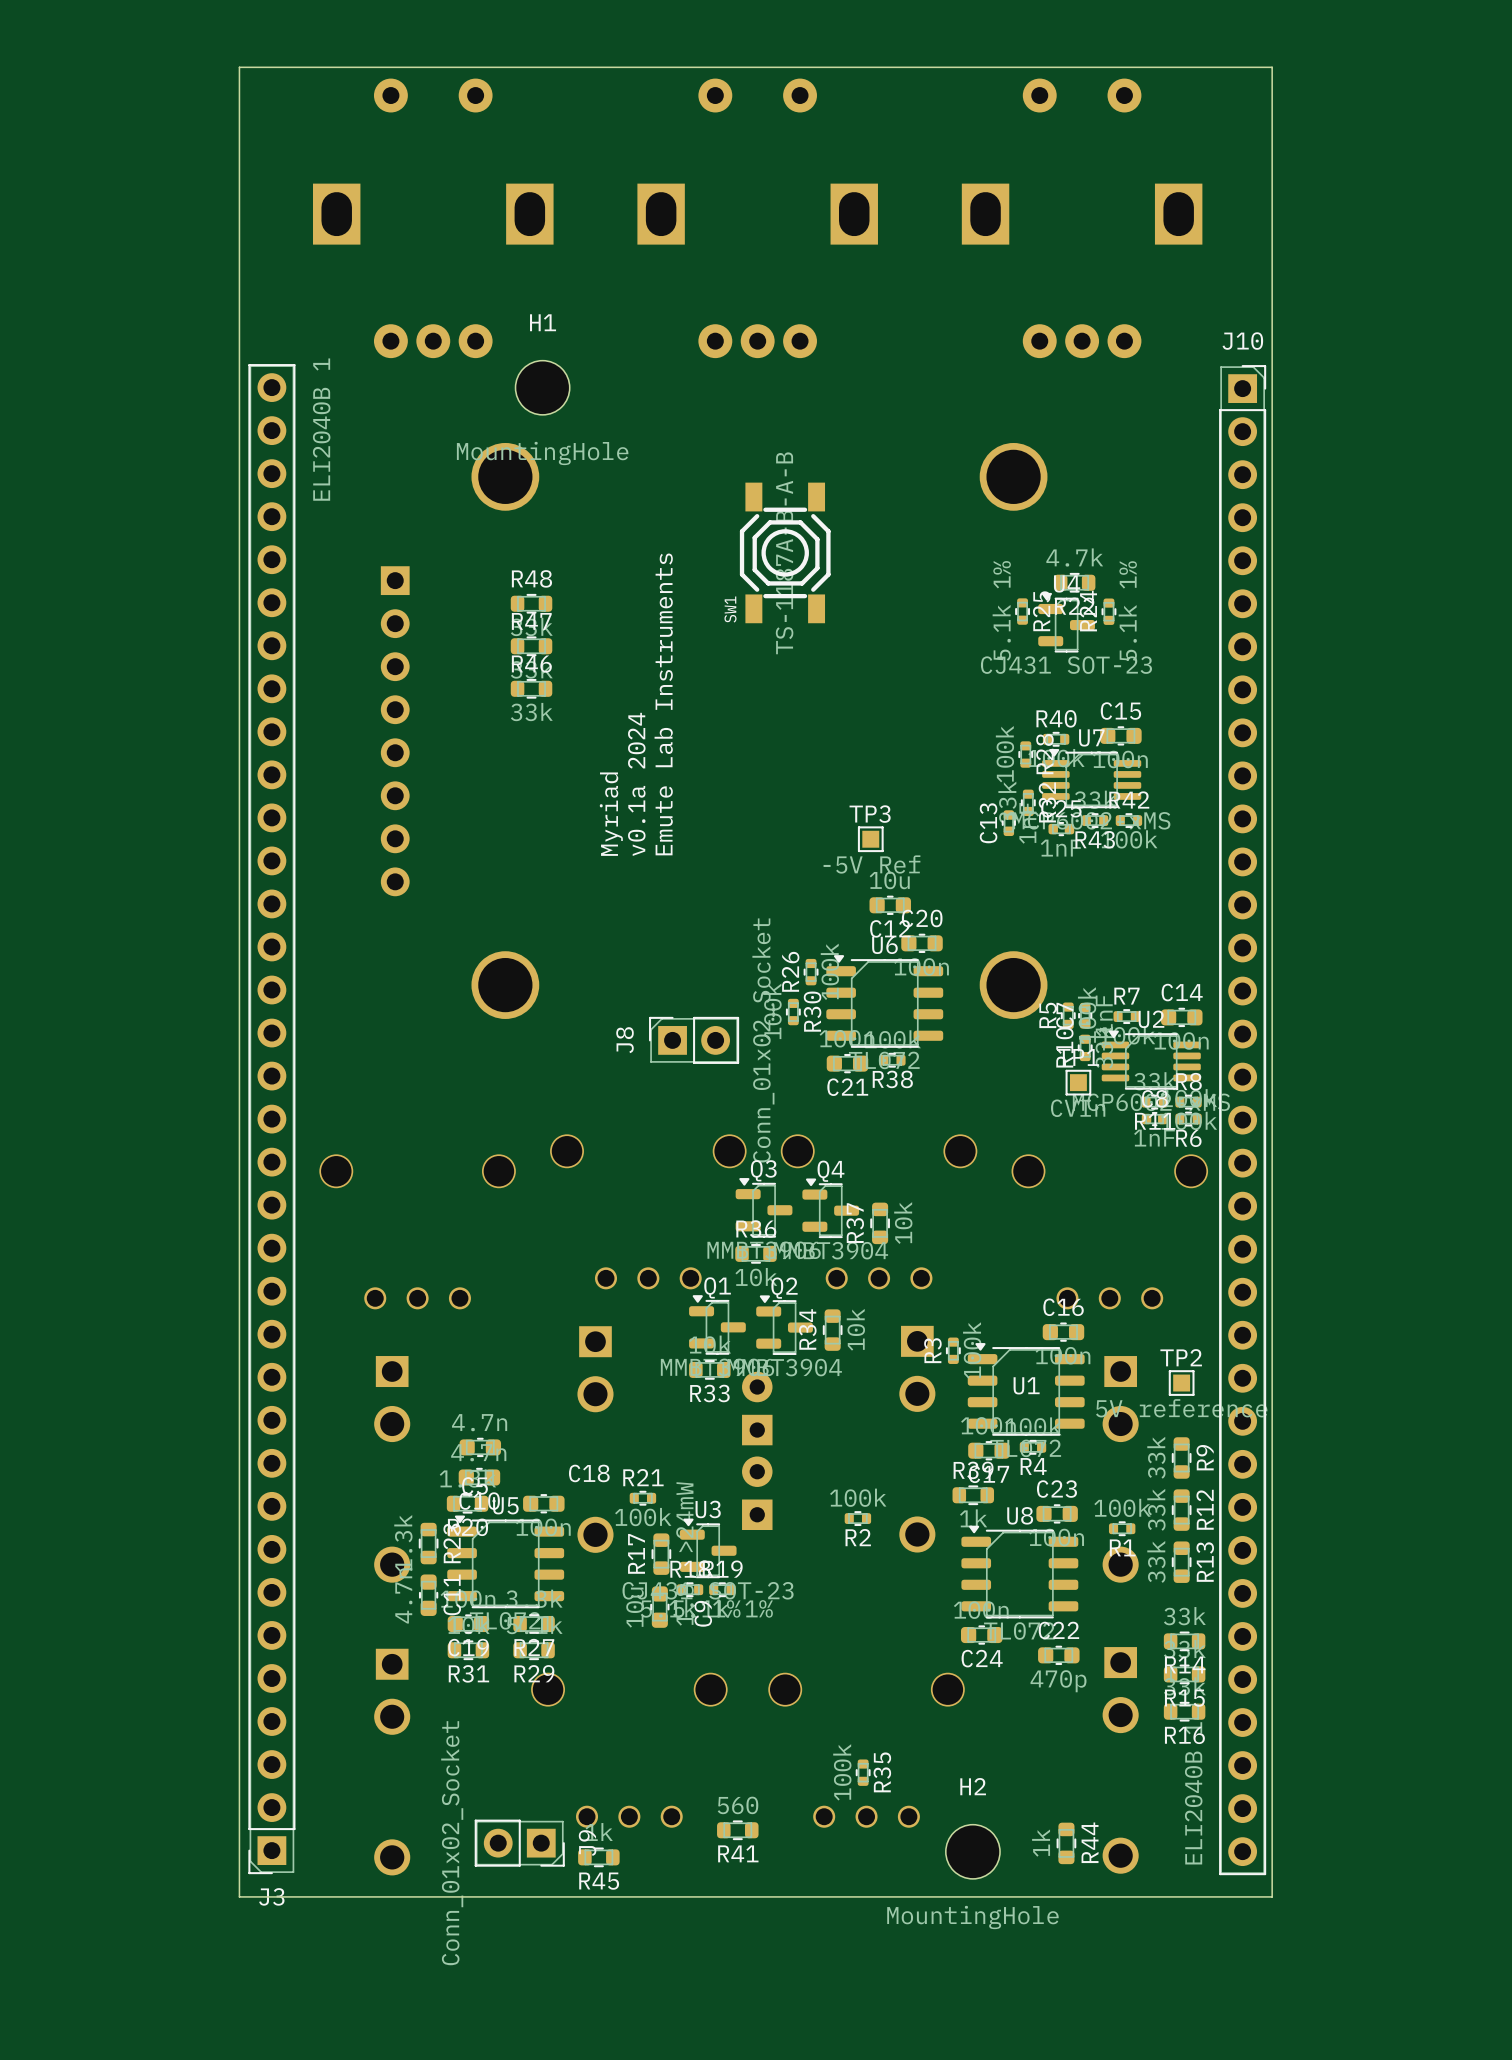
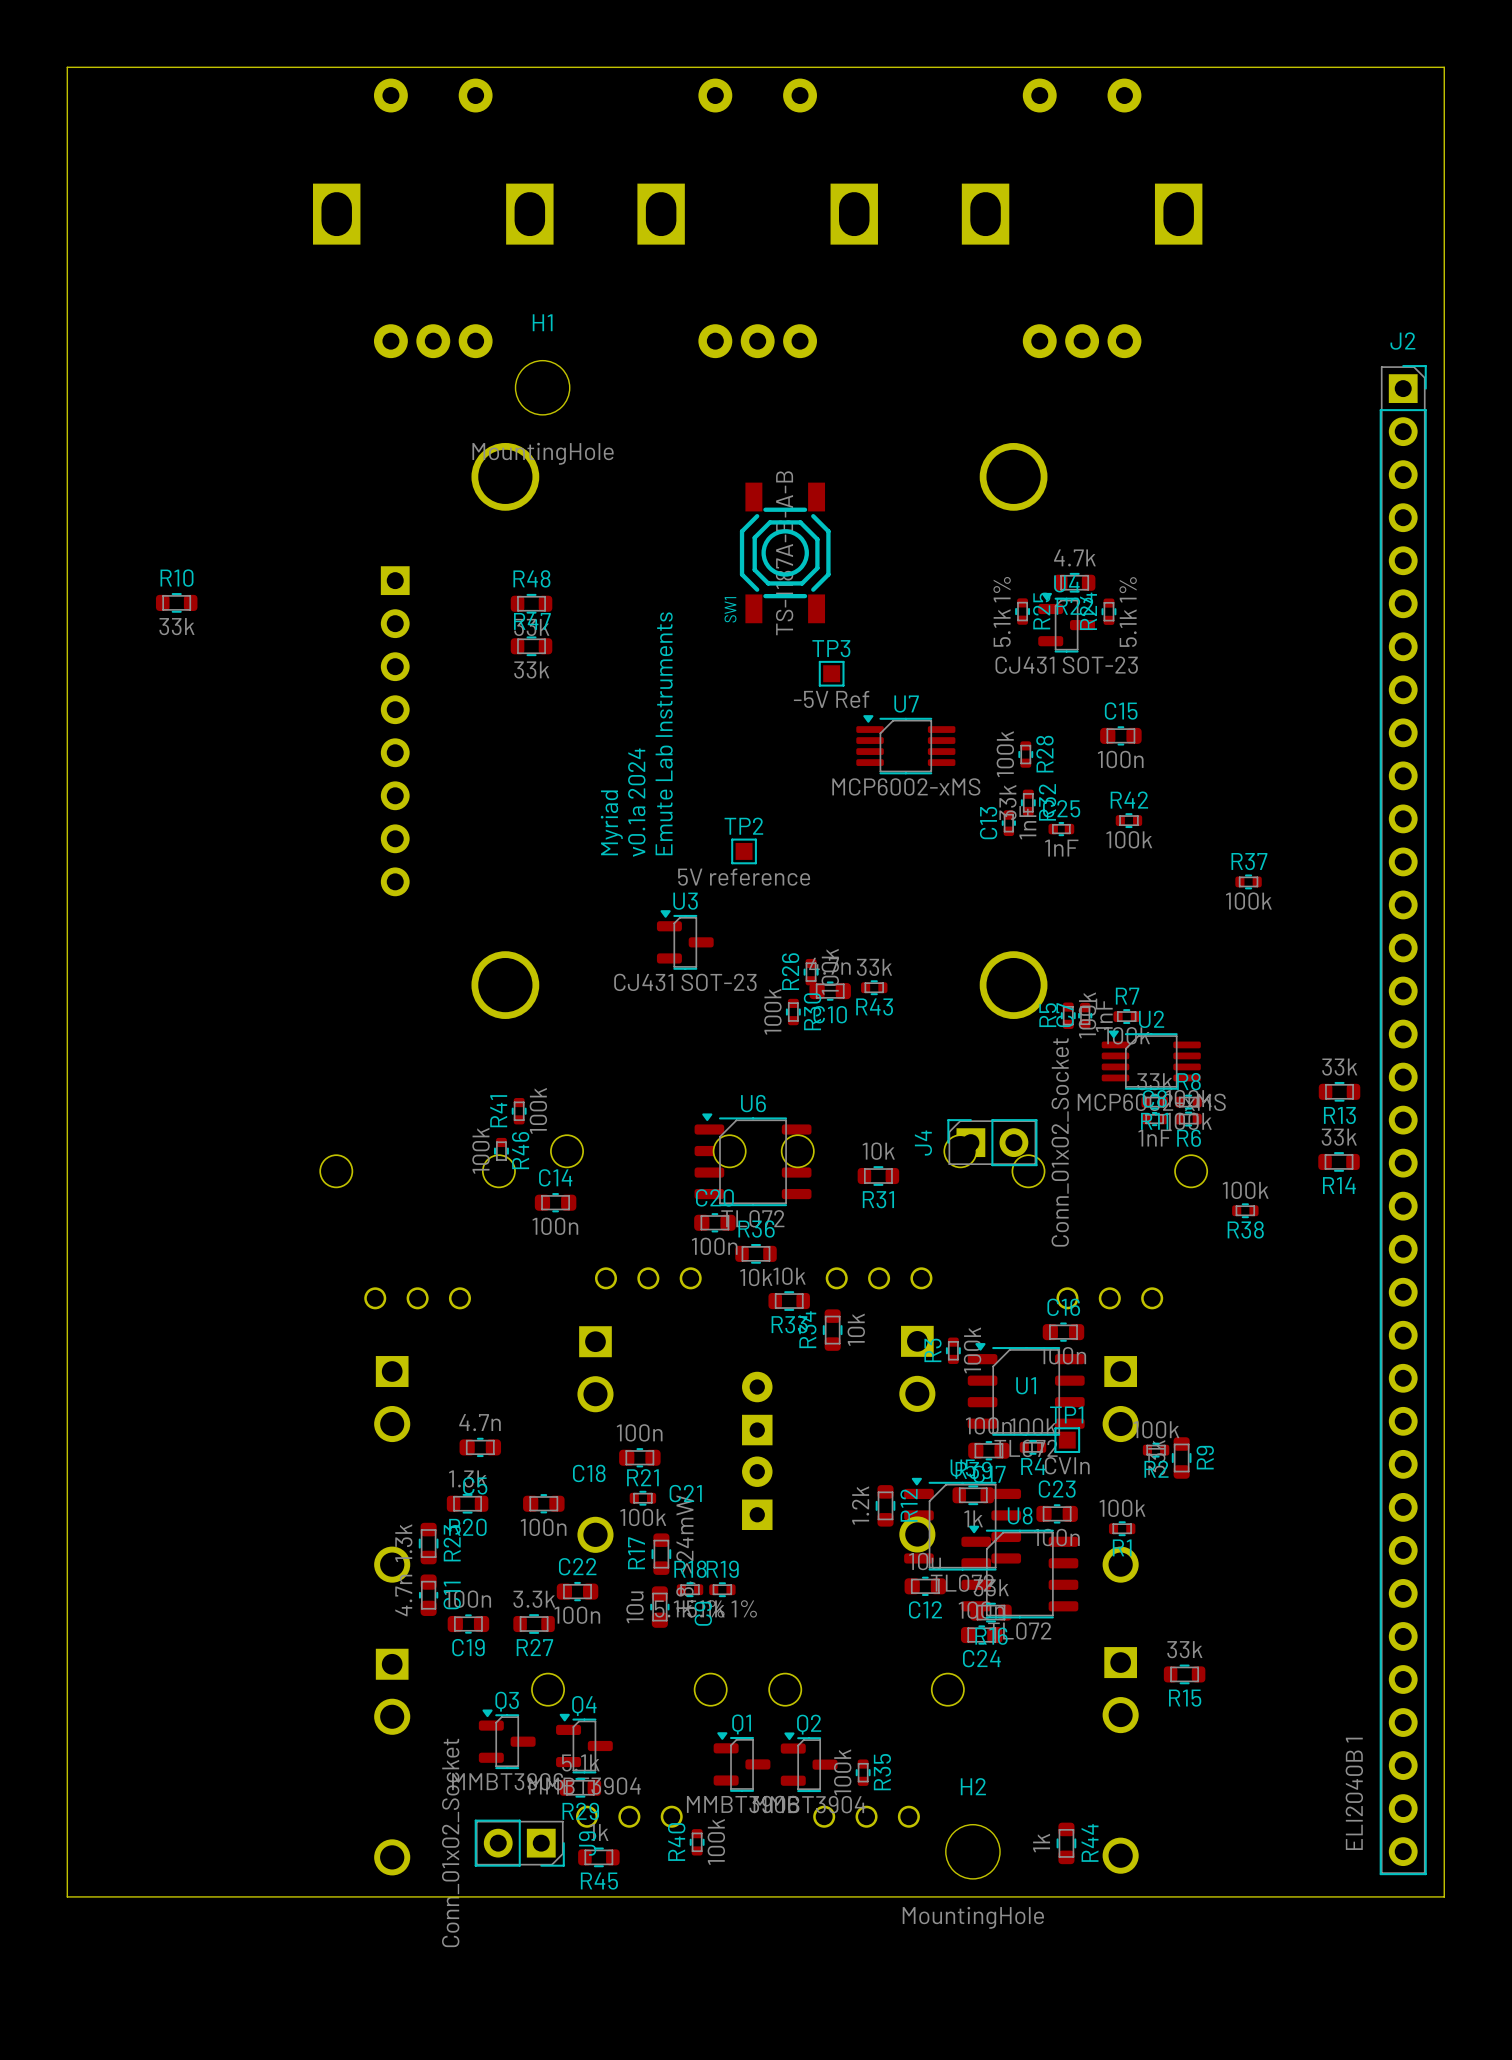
board edge: (239, 67) (239, 1896) -> (239, 67) (67, 67) (67, 1896) (239, 1896)
board edge: (1272, 67) (1272, 1896) -> (1272, 67) (1444, 67) (1444, 1896) (1272, 1896)
R46 footprint: [510, 678, 553, 699] -> [494, 1137, 509, 1165]
R46 value: 33k (531, 712) -> 100k (481, 1150)
R40 rotation: 0° (1056, 739) -> 90° clockwise (697, 1842)
R40 position: (1056, 739) -> (697, 1842)
U7 position: (1091, 778) -> (905, 744)
R43 position: (1095, 820) -> (874, 987)
TP3 position: (870, 839) -> (831, 673)
C12 position: (890, 905) -> (925, 1586)
C20 position: (922, 943) -> (714, 1222)
U6 position: (884, 1001) -> (753, 1159)
C14 position: (1181, 1017) -> (555, 1202)
R10 footprint: [1077, 1034, 1093, 1062] -> [155, 593, 198, 613]
J8: Conn_01x02_Socket (694, 1040) -> none
R38 position: (892, 1060) -> (1245, 1210)
C21 position: (847, 1063) -> (639, 1457)
TP1 position: (1078, 1082) -> (1067, 1440)
C21 name position: C21 (847, 1087) -> C21 (685, 1493)
J3: ELI2040B 1 (271, 1119) -> none
J10: ELI2040B 1 (1242, 1120) -> none
J2: none -> ELI2040B 1 (1403, 1120)
J4: none -> Conn_01x02_Socket (992, 1142)
R37 footprint: [870, 1202, 890, 1245] -> [1235, 874, 1262, 890]
Q3 position: (764, 1207) -> (507, 1739)
Q4 position: (830, 1208) -> (584, 1743)
R37 value: 10k (903, 1223) -> 100k (1248, 901)
Q1 position: (717, 1324) -> (742, 1762)
Q2 position: (784, 1325) -> (809, 1762)
R33 position: (709, 1369) -> (789, 1301)
TP2 position: (1181, 1383) -> (744, 851)
C10 position: (479, 1477) -> (830, 991)
R12 value: 33k (1156, 1509) -> 1.2k (860, 1505)
R12 position: (1181, 1510) -> (885, 1505)
R2 position: (857, 1518) -> (1156, 1450)
U3 position: (708, 1548) -> (685, 939)
U5 position: (505, 1561) -> (962, 1524)
R13 rotation: 0° (1181, 1562) -> 90° clockwise (1339, 1091)
R13 position: (1181, 1562) -> (1339, 1091)
R14 position: (1184, 1641) -> (1339, 1161)
R31 position: (468, 1650) -> (878, 1176)
R29 position: (534, 1650) -> (580, 1787)
C22 position: (1058, 1655) -> (577, 1591)
C22 value: 470p (1058, 1681) -> 100n (577, 1615)
R16 position: (1184, 1711) -> (990, 1612)
R41 value: 560 (737, 1805) -> 100k (538, 1110)
R41 footprint: [717, 1820, 759, 1841] -> [511, 1098, 527, 1125]

